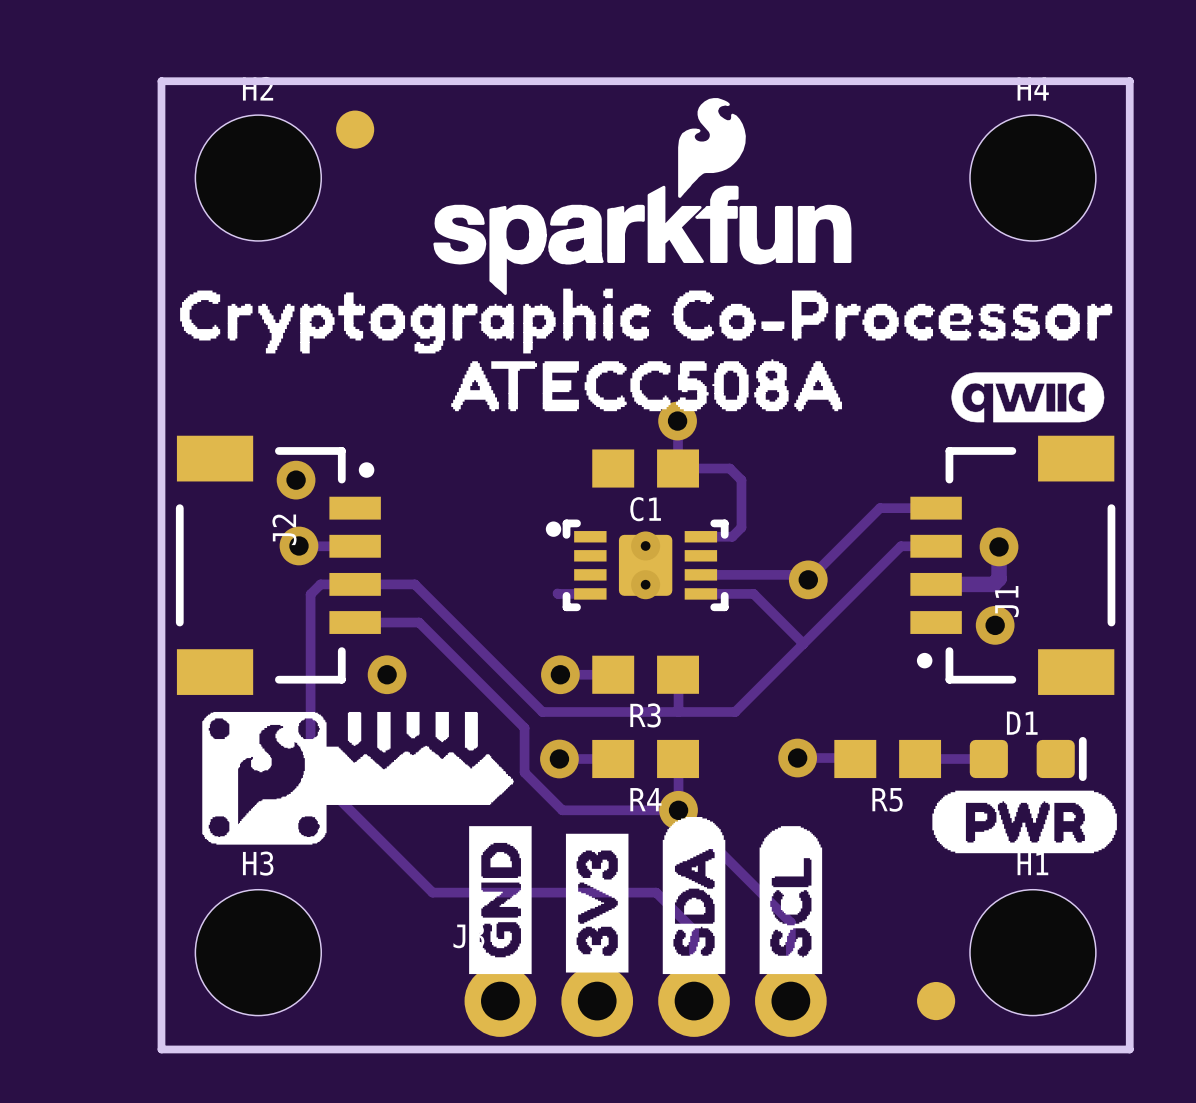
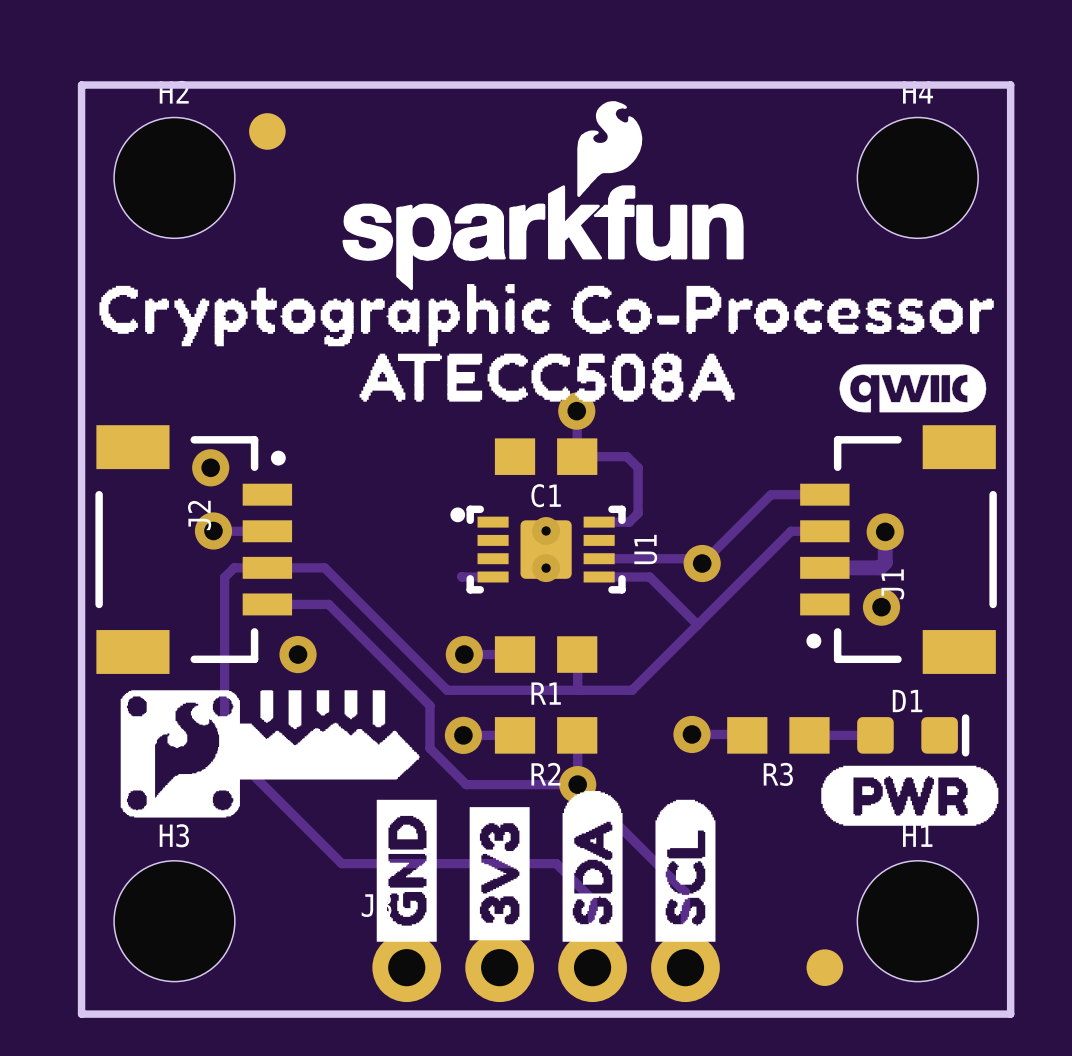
U1 name: none -> U1 (645, 549)
R3 name: R3 (645, 715) -> R1 (546, 693)
R4 name: R4 (645, 799) -> R2 (545, 774)
R5 name: R5 (887, 799) -> R3 (778, 774)

